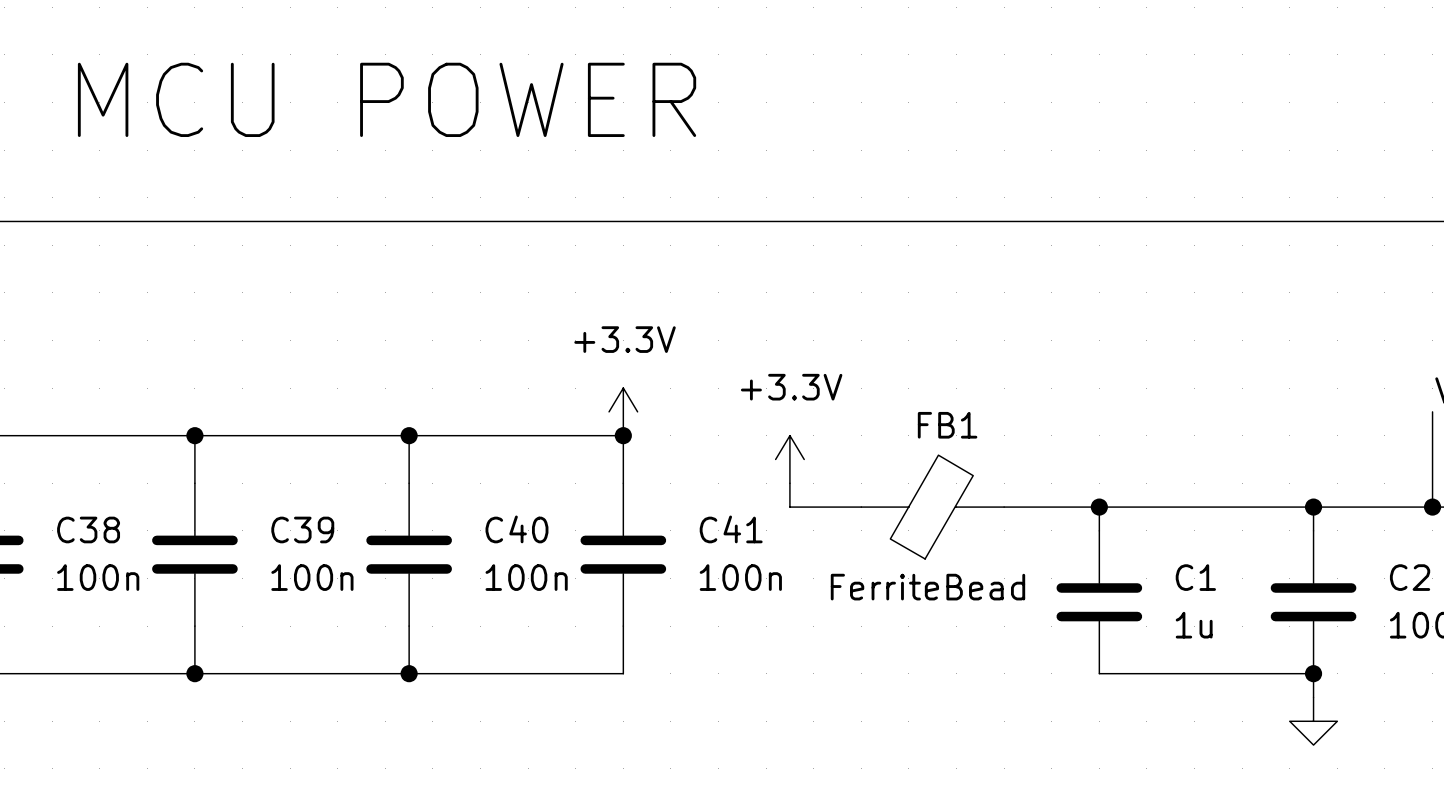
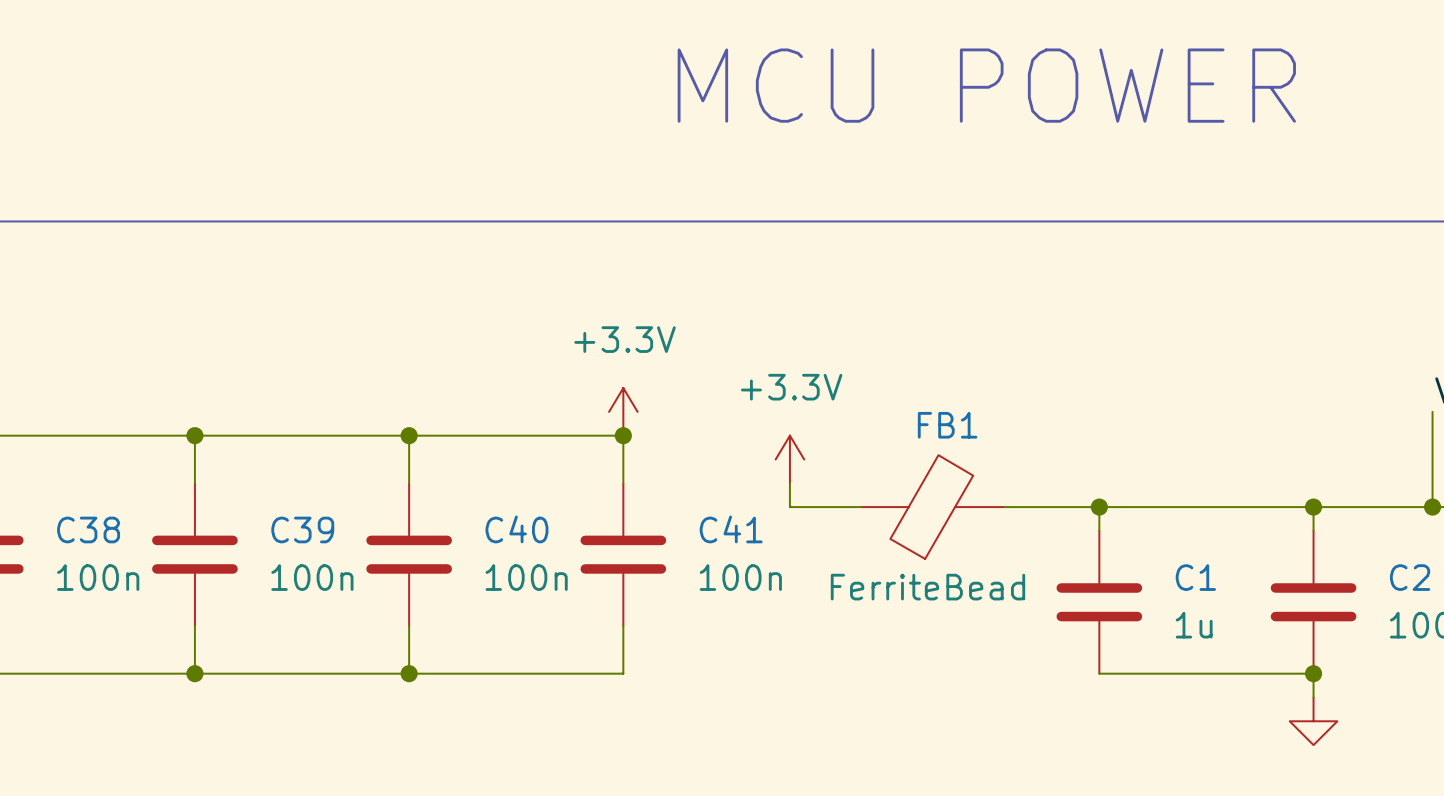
text: none -> MCU POWER (986, 85)
text: MCU POWER (387, 99) -> none

